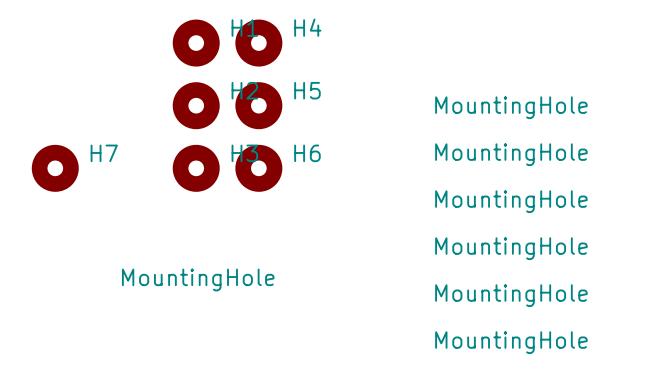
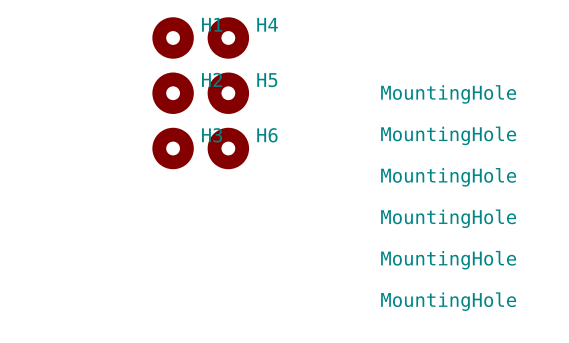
H7: MountingHole (55, 168) -> none

